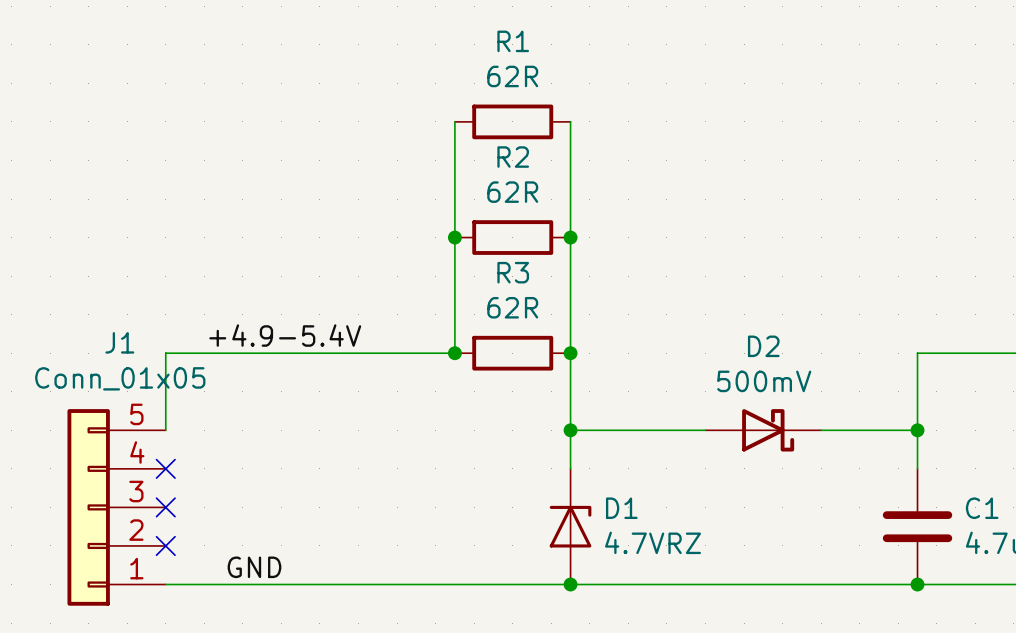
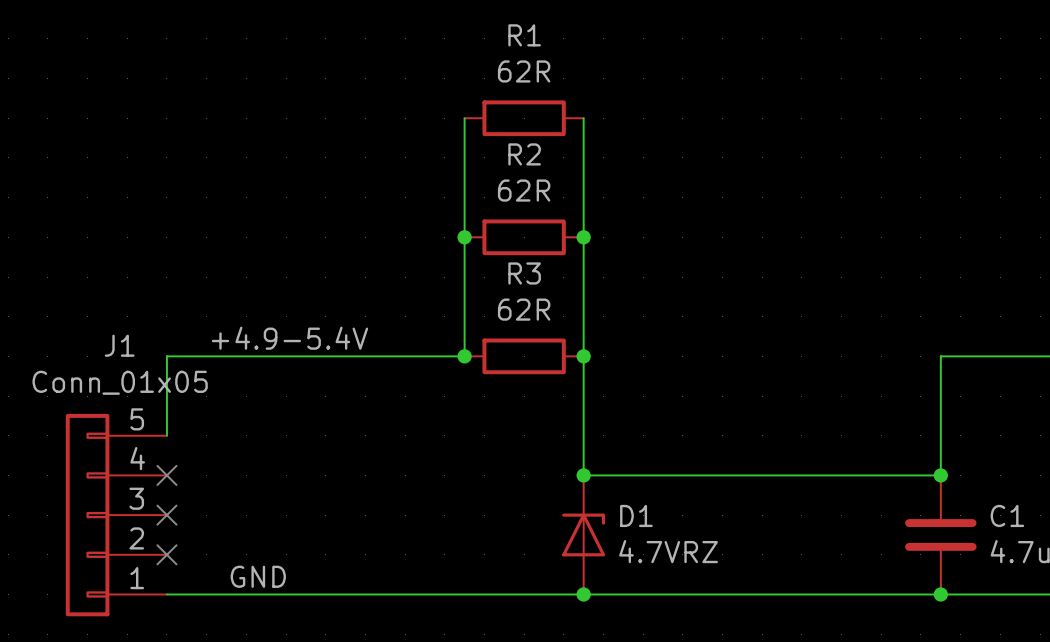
wire: (570, 430) (705, 430) -> none
junction position: (570, 430) -> (583, 475)
D2: 500mV (763, 430) -> none
wire: (821, 430) (917, 430) -> none
junction position: (917, 430) -> (940, 475)
wire: none -> (583, 475) (940, 475)

